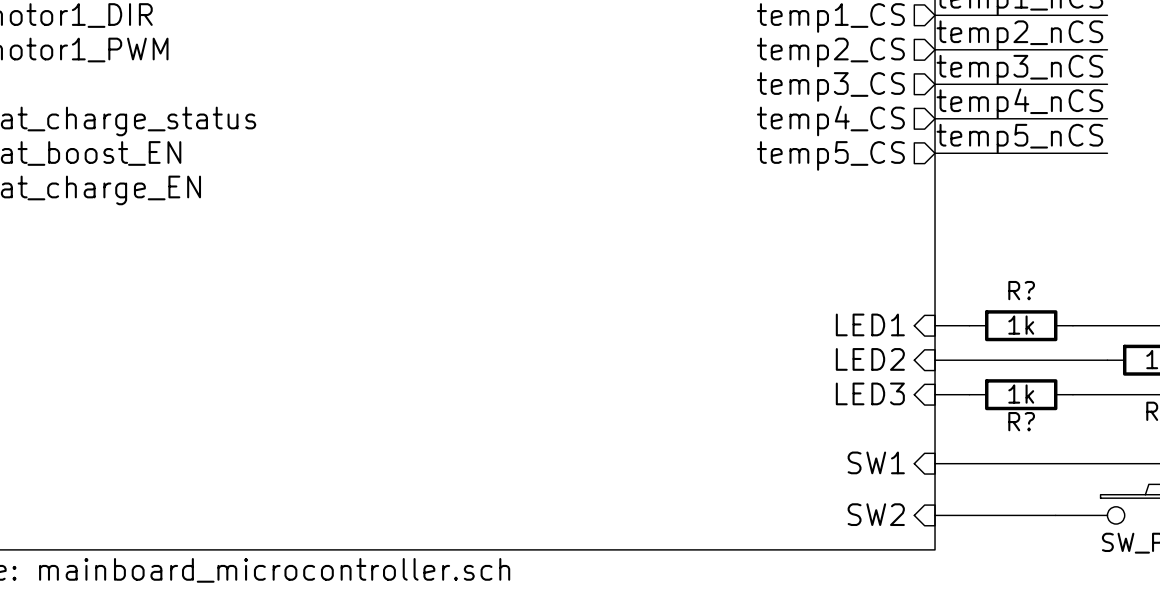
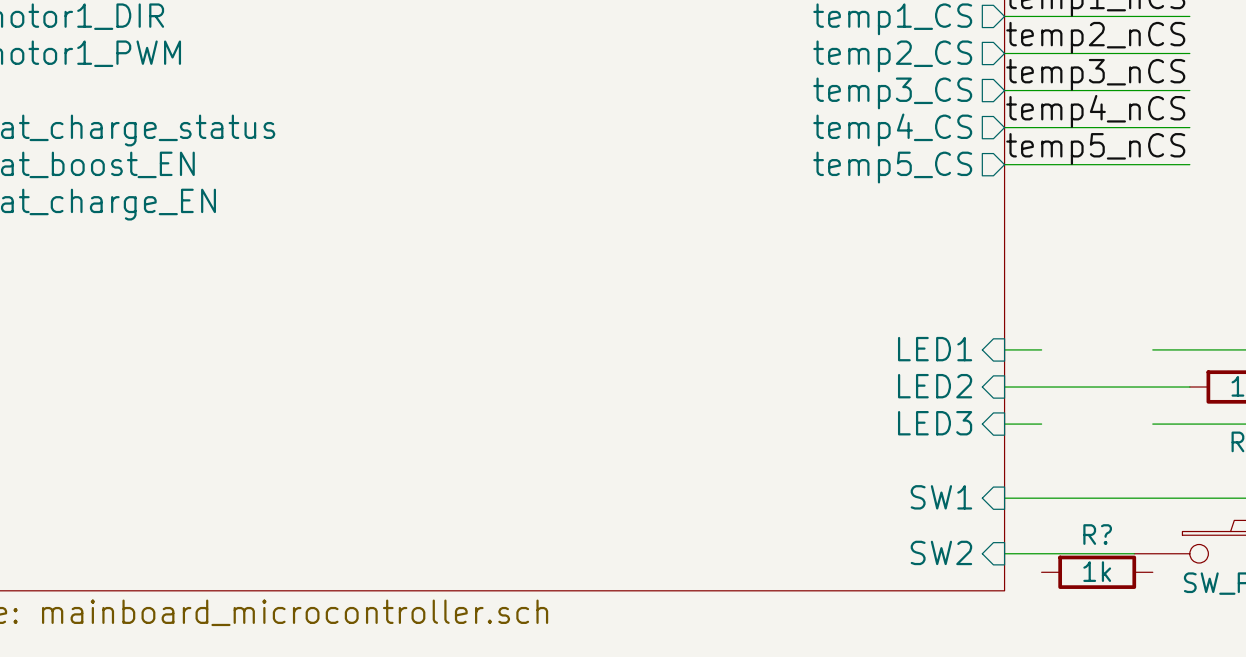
R?: 1k (1021, 325) -> none
R?: 1k (1021, 394) -> none
R?: none -> 1k (1097, 572)

